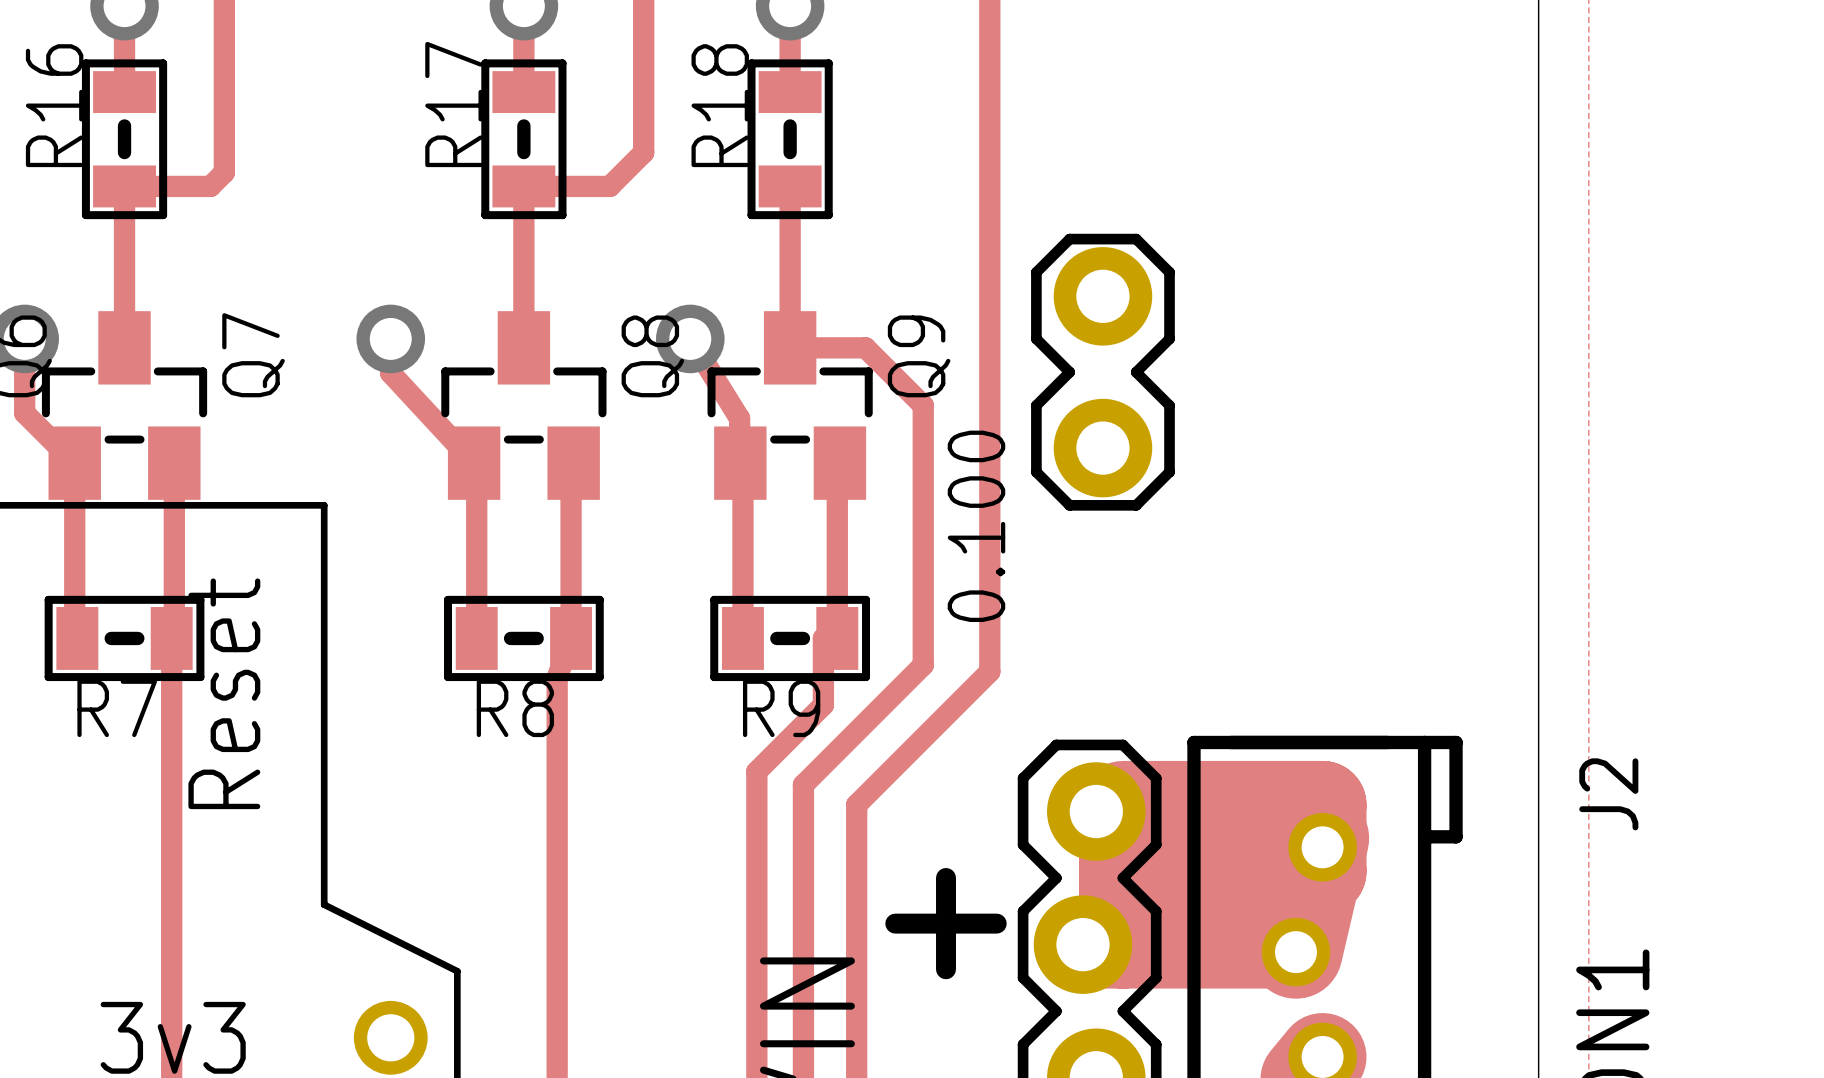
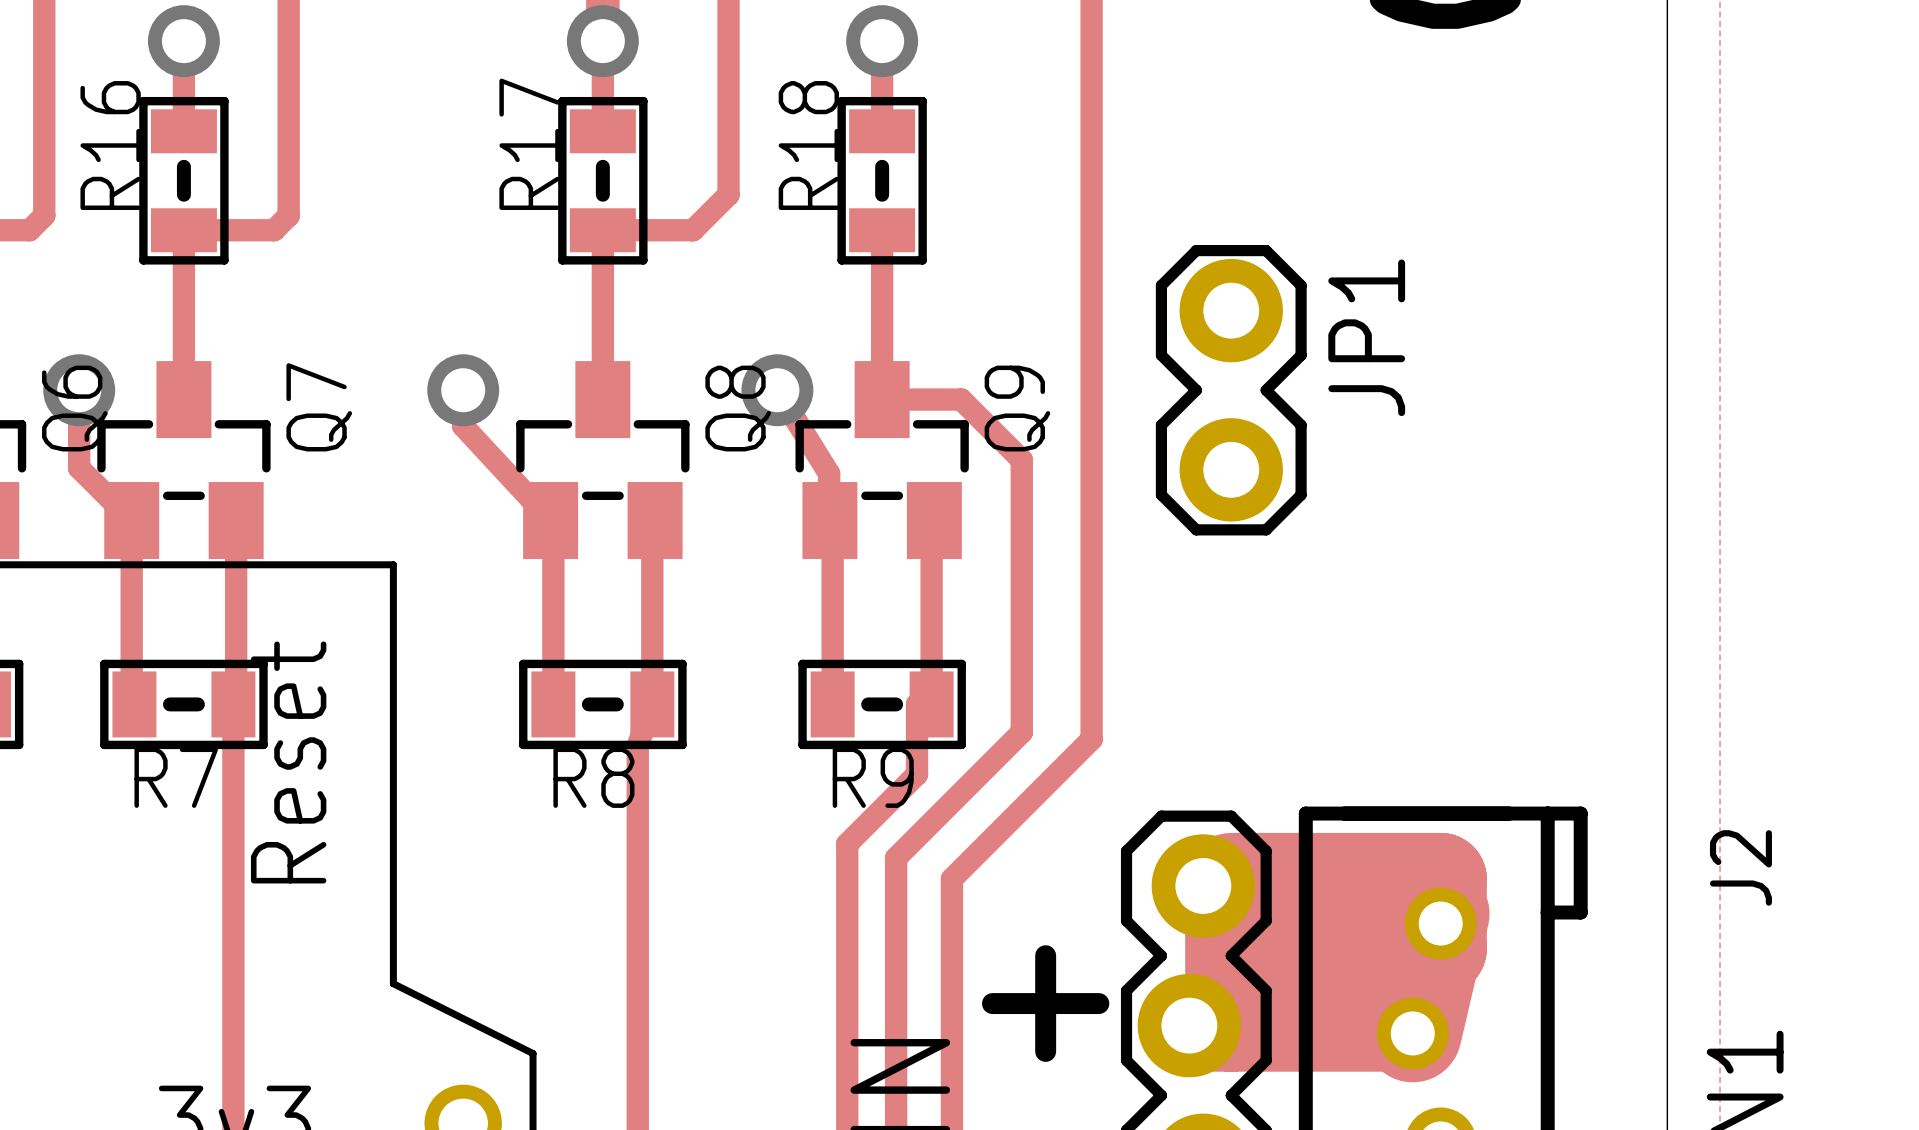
JP1 name: none -> JP1 (1366, 337)
JP1 position: (1102, 372) -> (1231, 390)
JP1 value: 0.100 (976, 526) -> none

